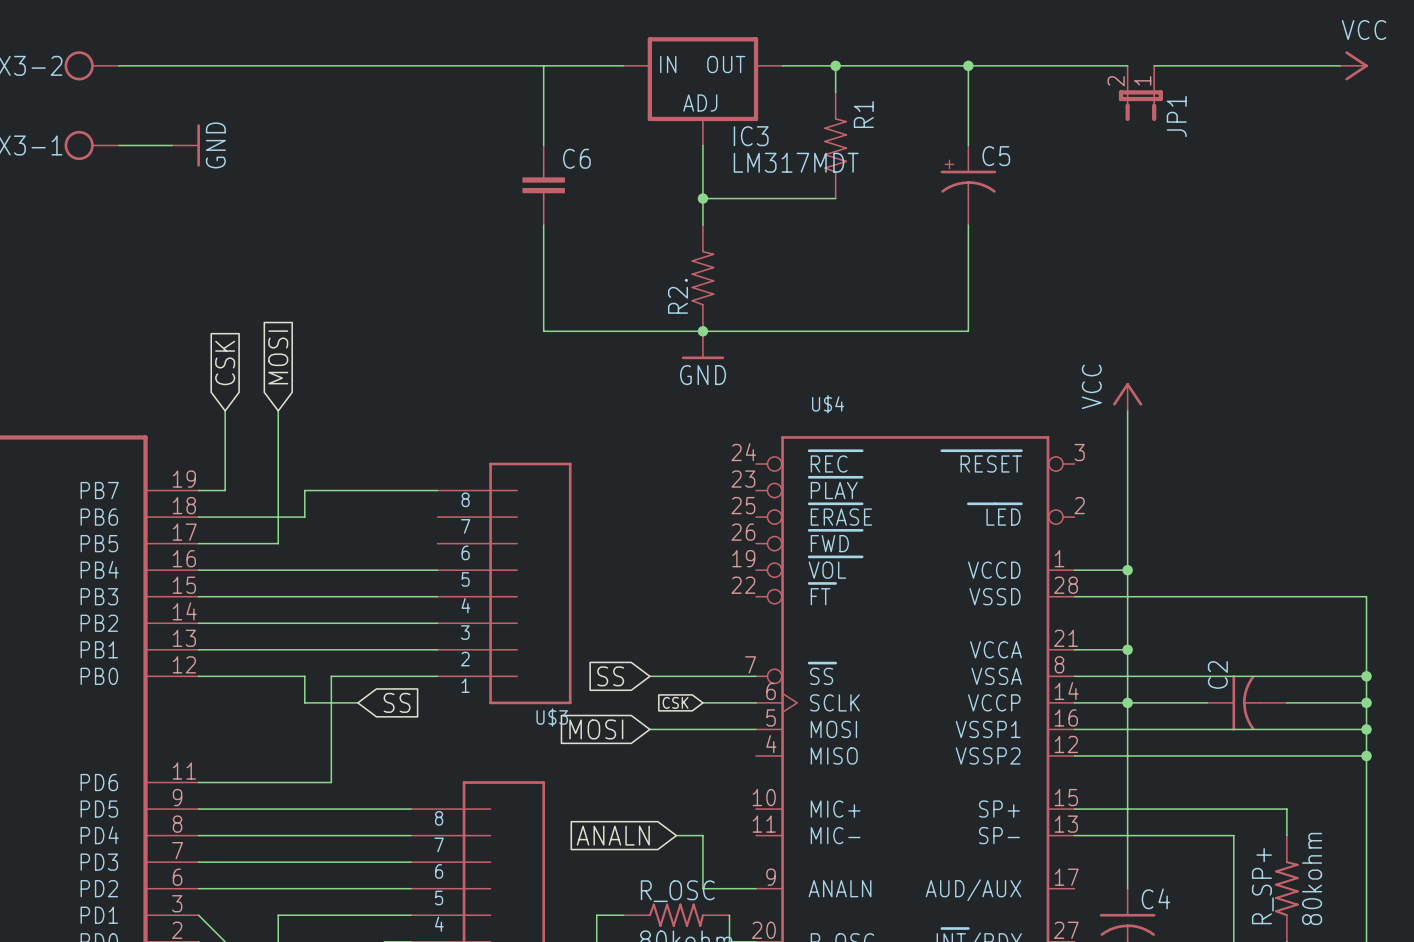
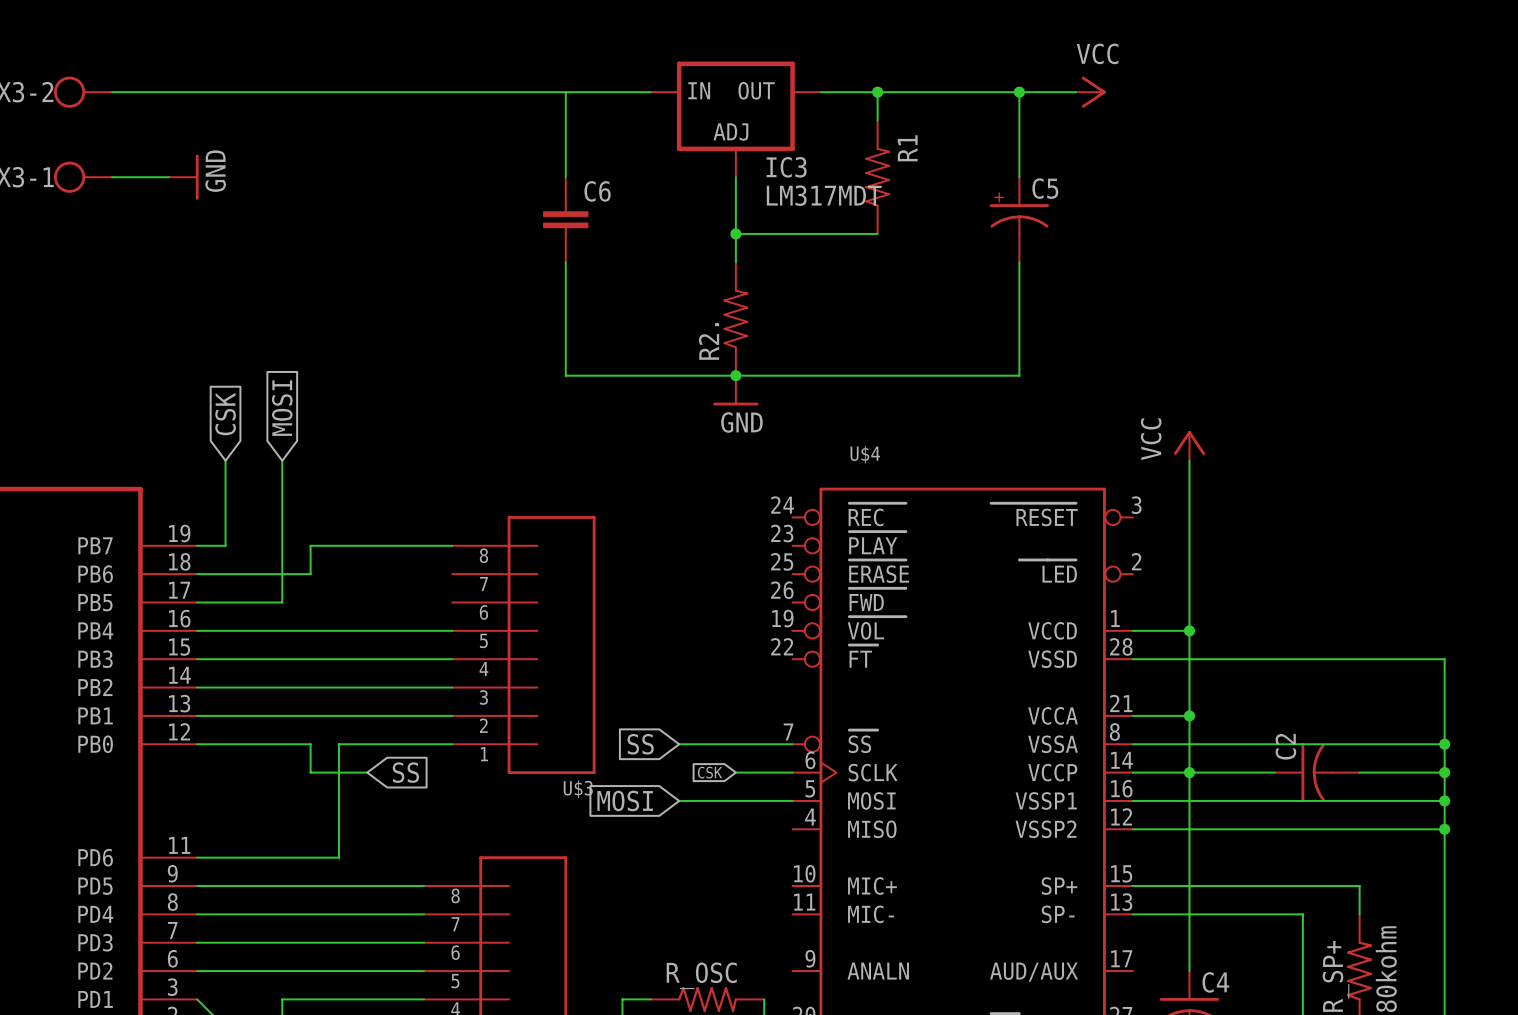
wire: (1021, 65) (1127, 65) -> none
power symbol: none -> VCC (1090, 92)
wire: (1154, 65) (1339, 65) -> none
power symbol: VCC (1353, 65) -> none
JP1: (1140, 93) -> none
global label: ANALN (613, 835) -> none
wire: (676, 835) (702, 835) (702, 888) (756, 888) -> none

